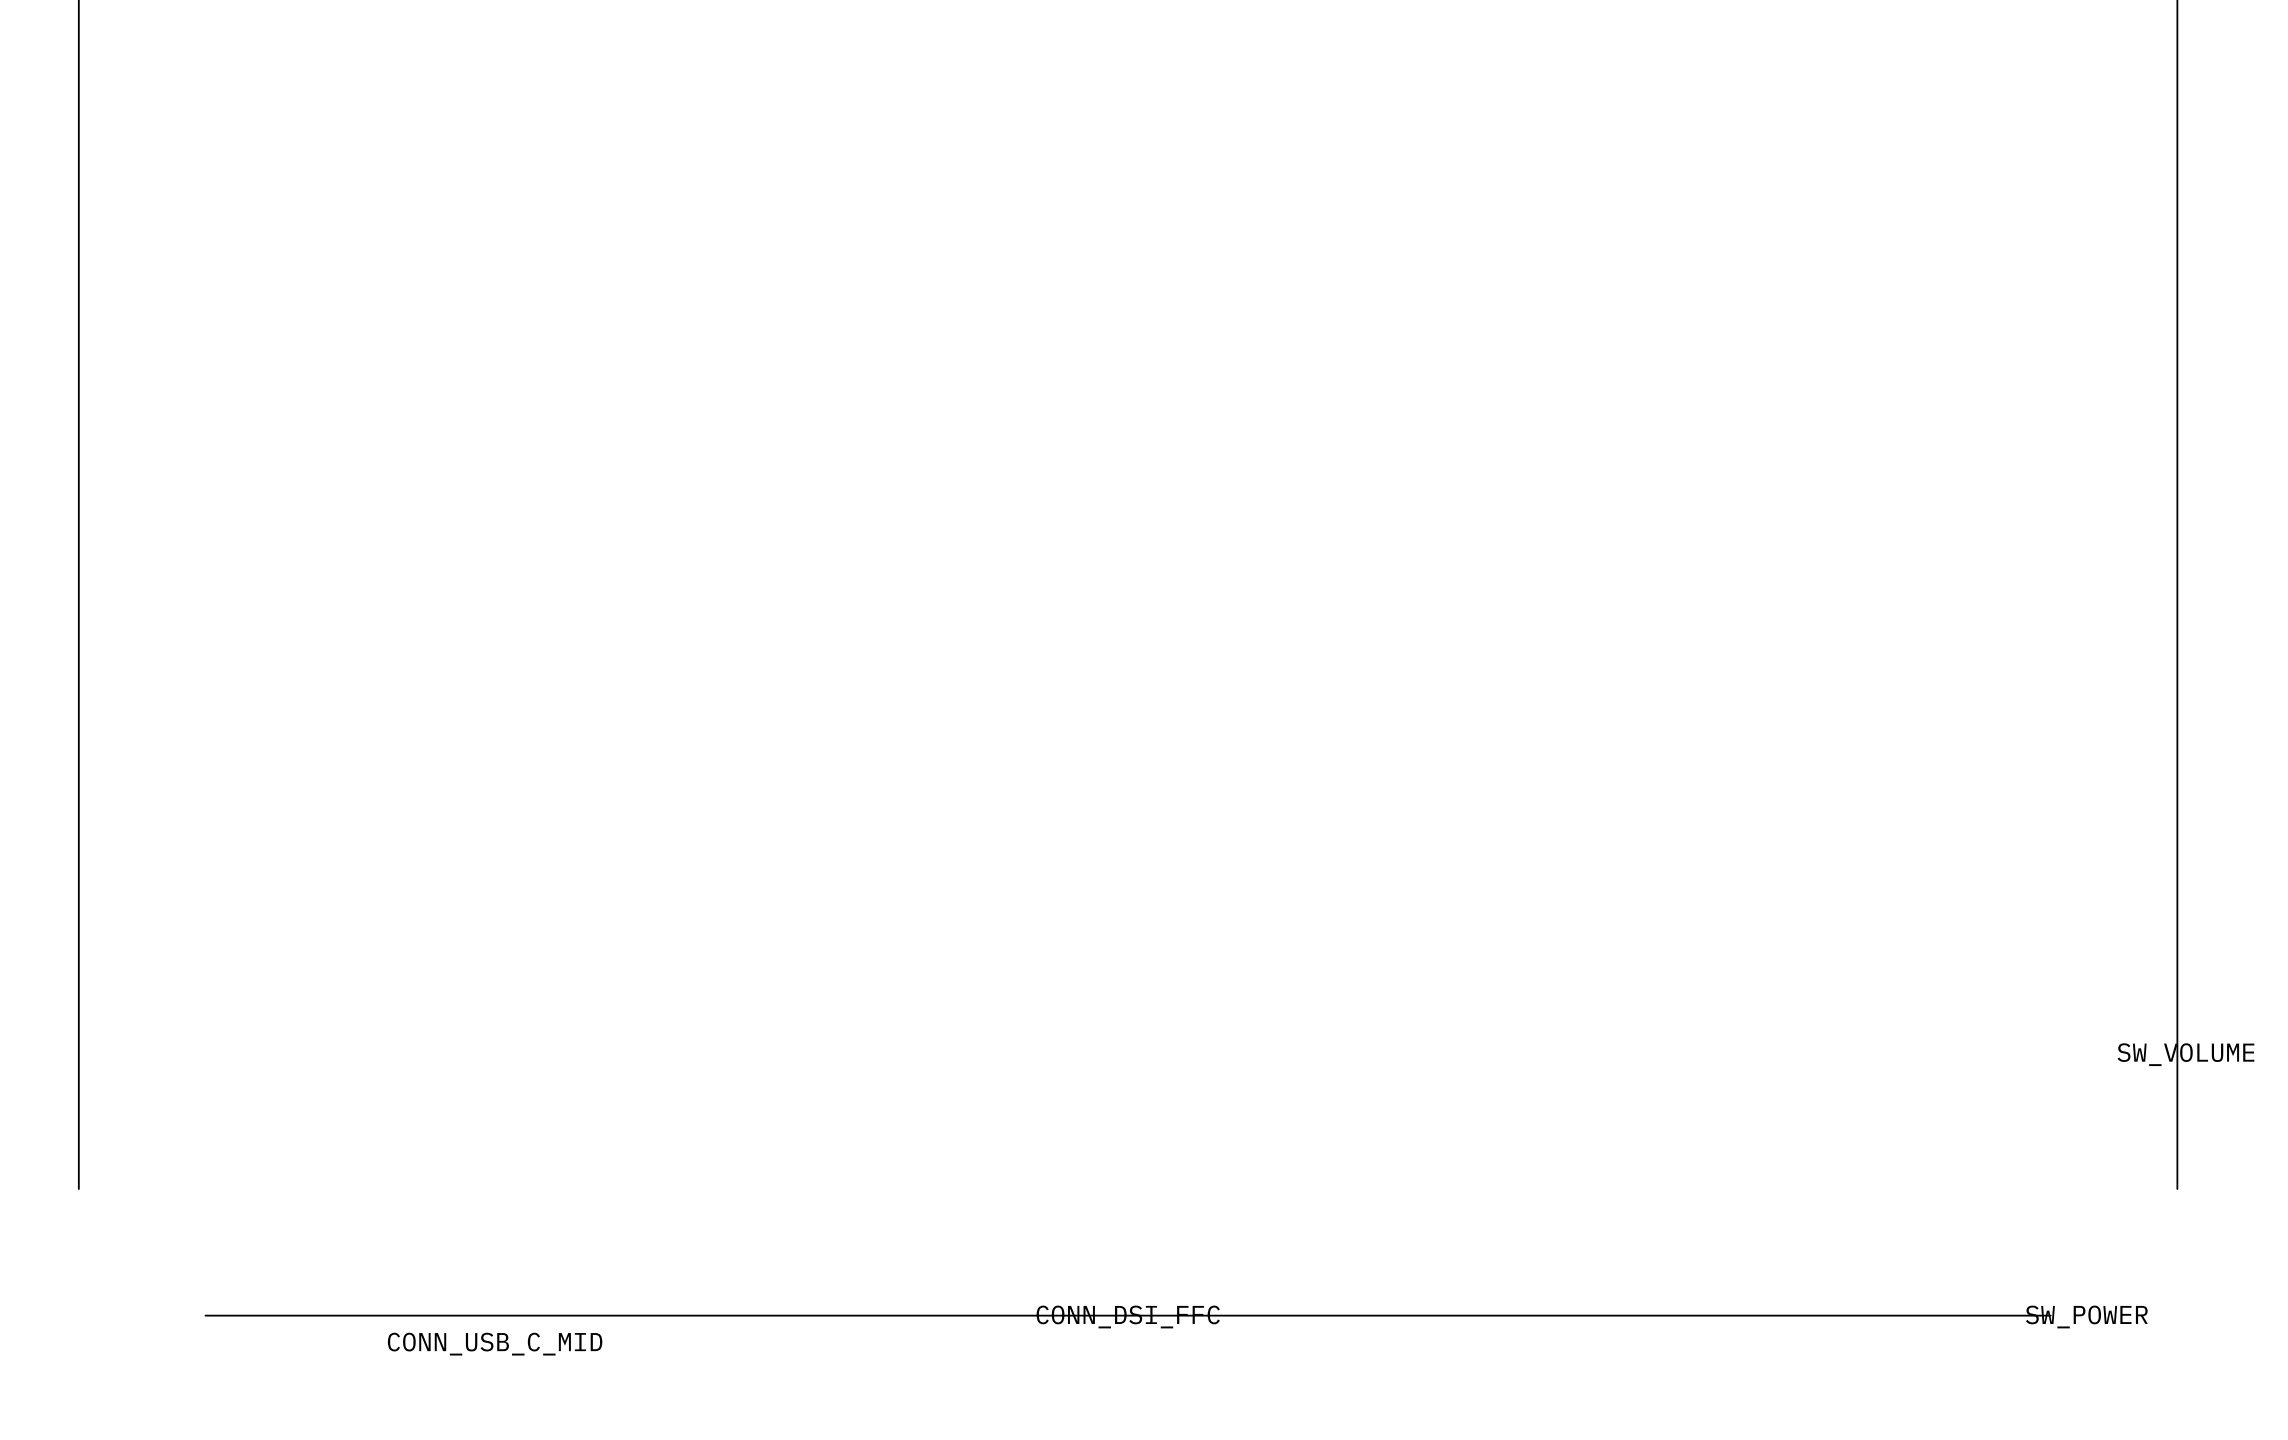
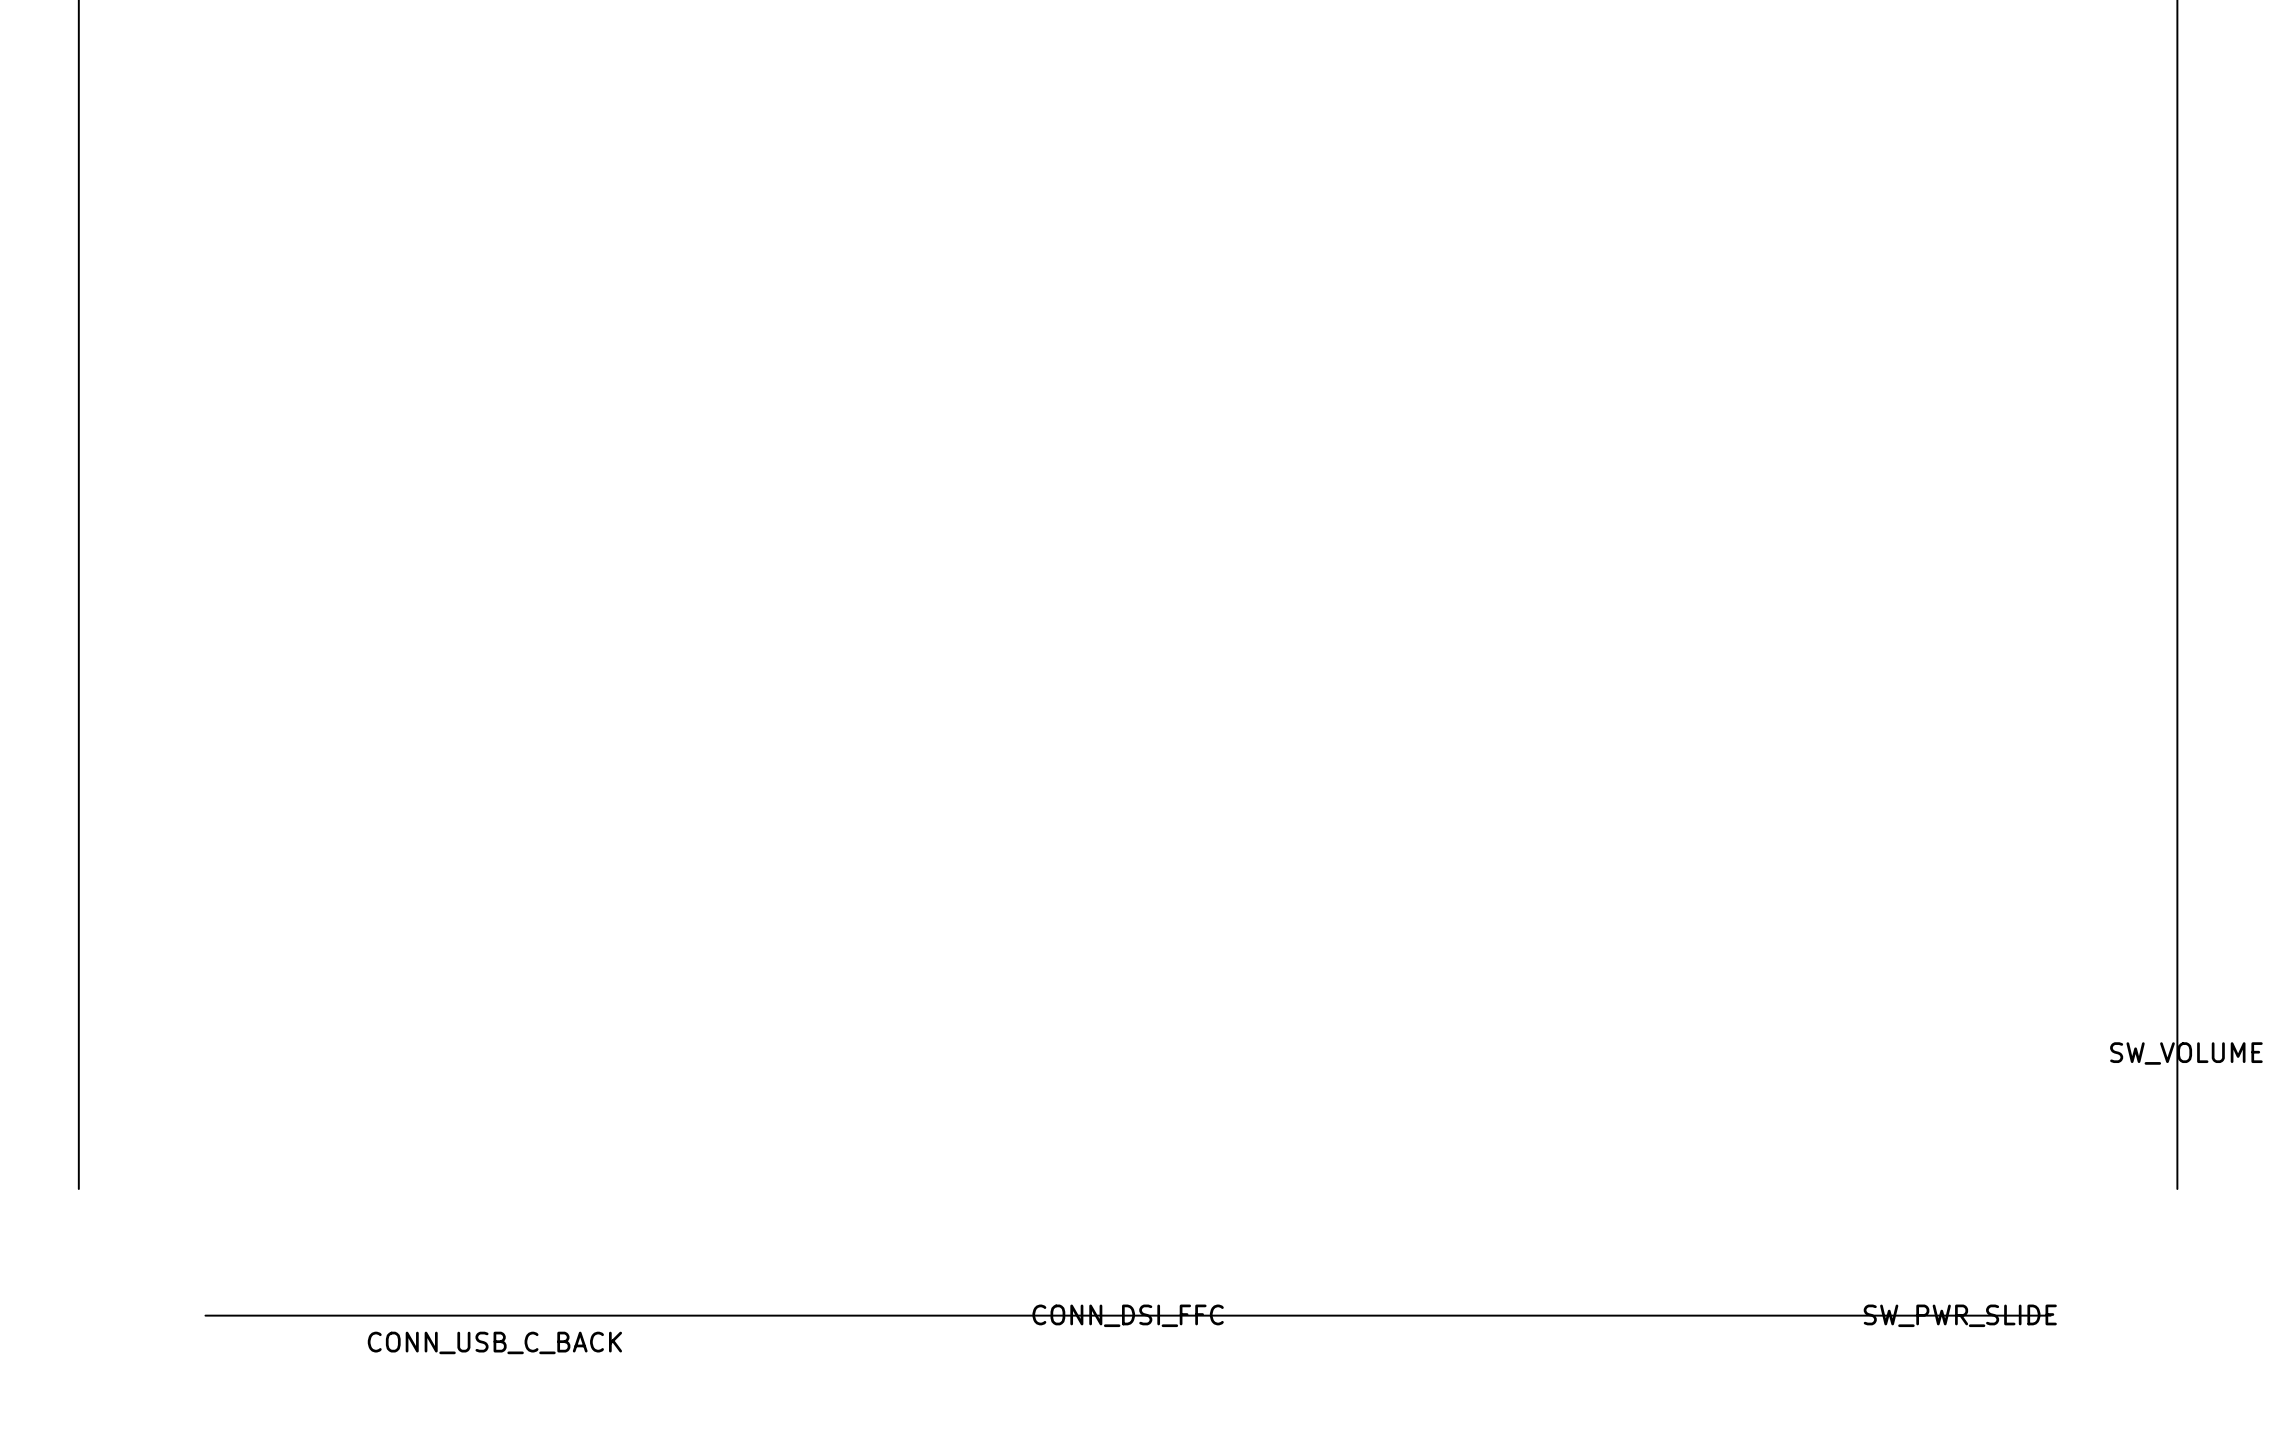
text: none -> SW_PWR_SLIDE (1960, 1315)
text: SW_POWER (2086, 1316) -> none
text: CONN_USB_C_MID (495, 1344) -> CONN_USB_C_BACK (494, 1342)

